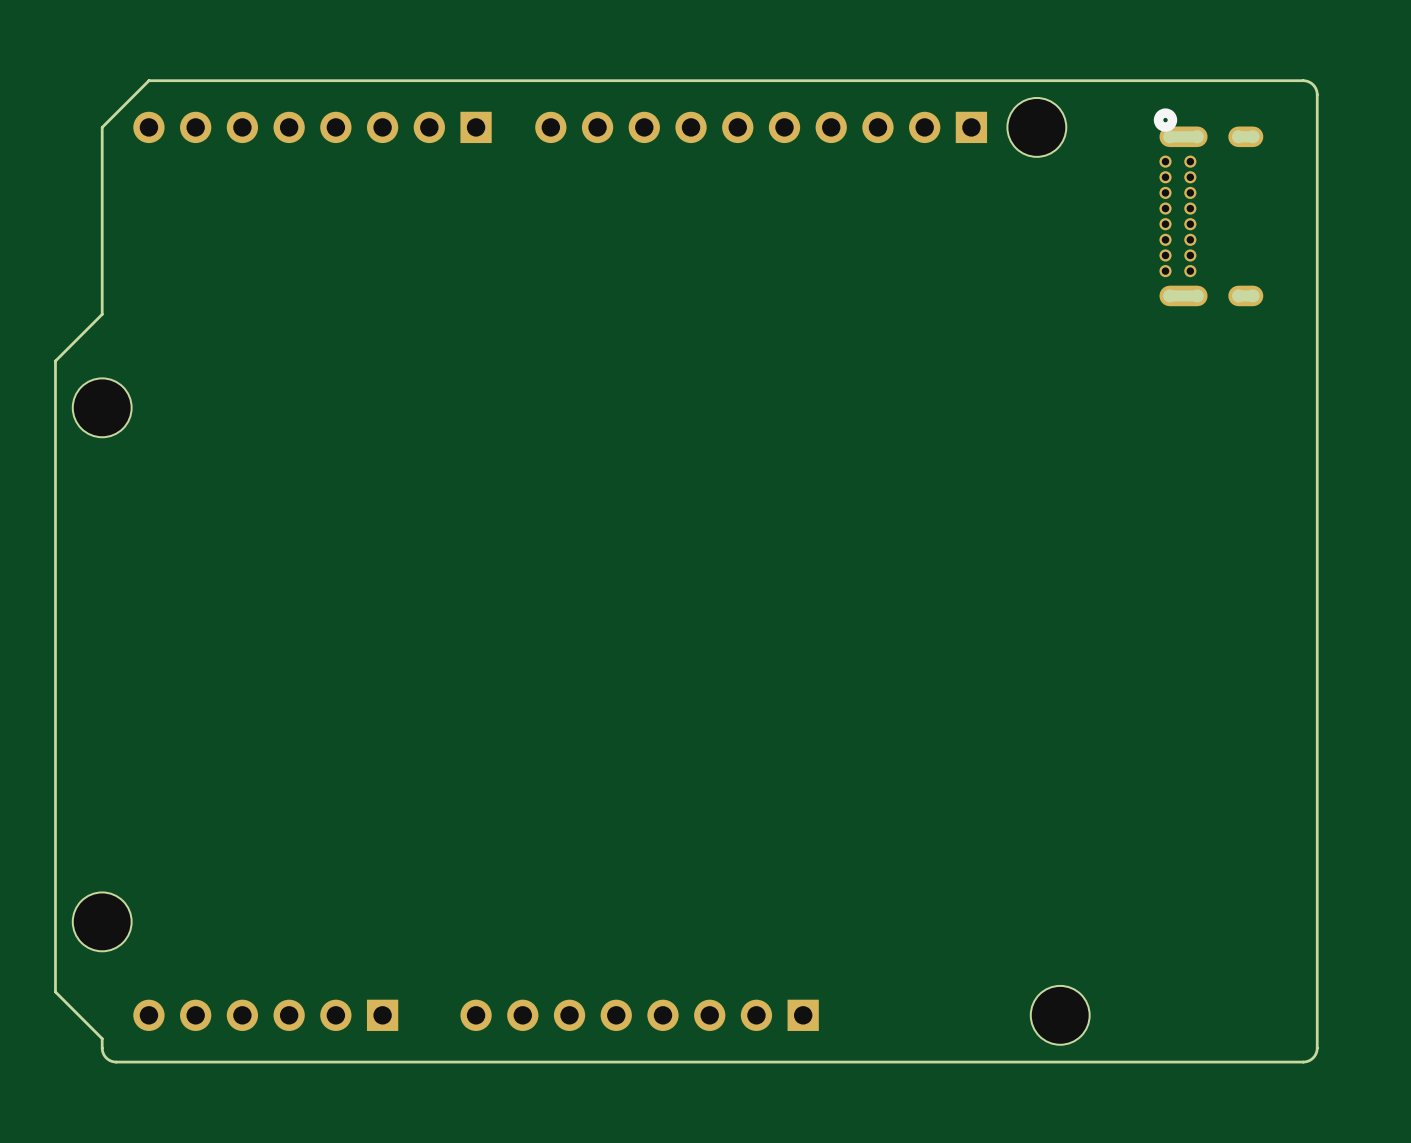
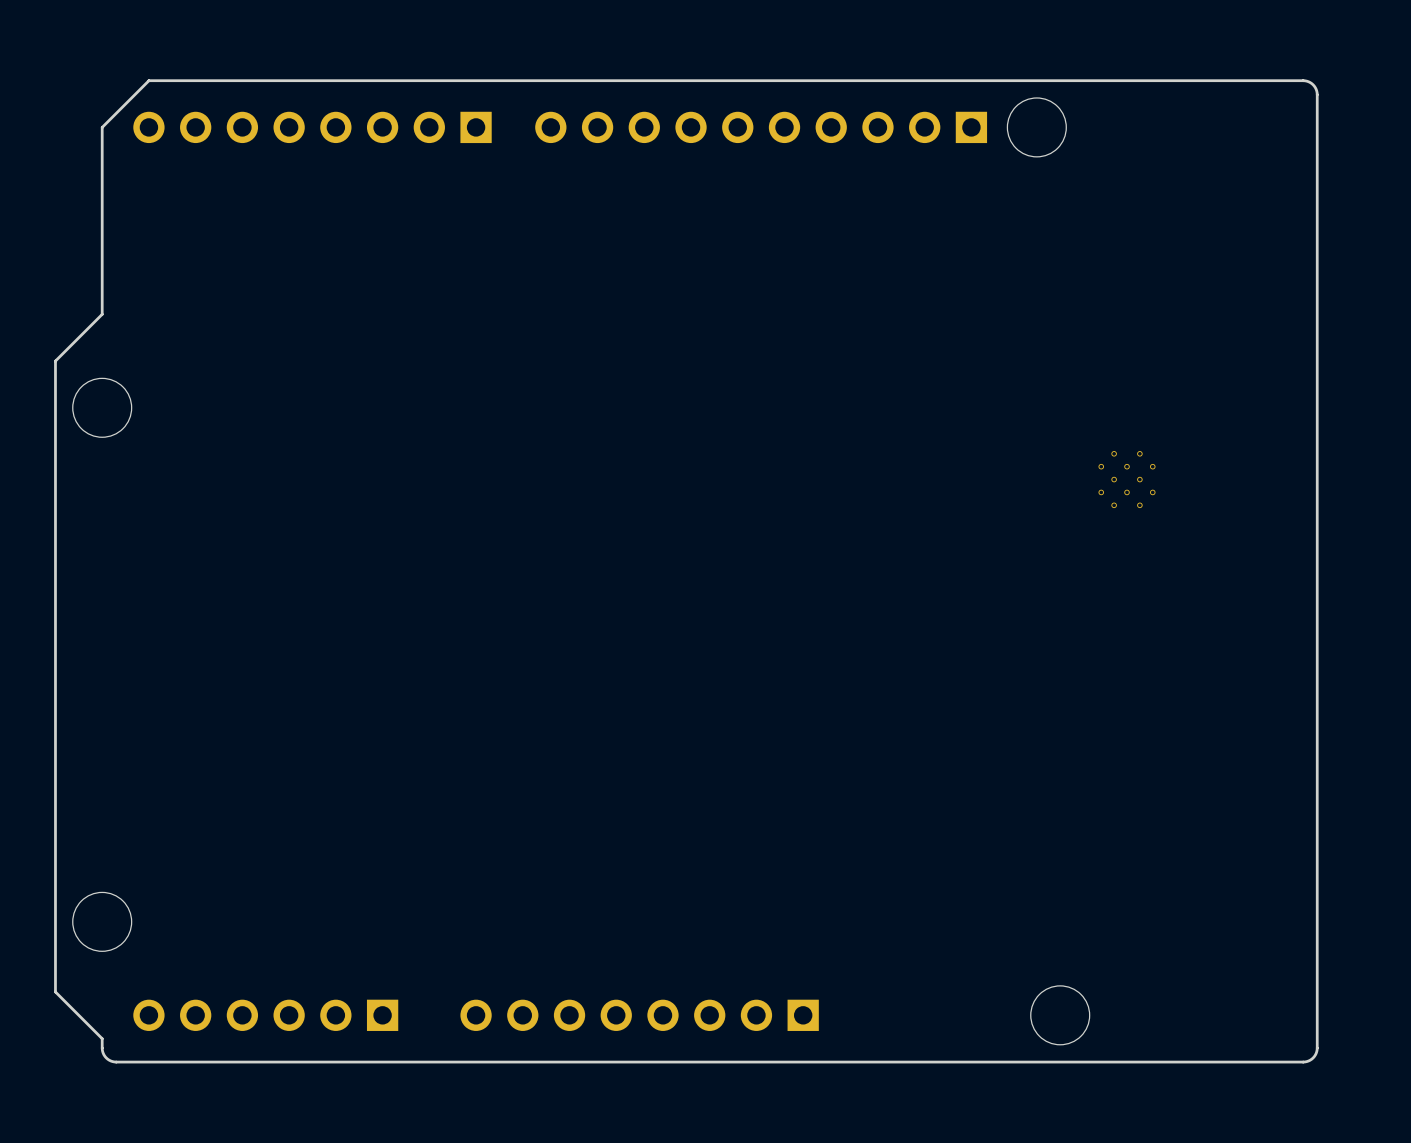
part: (1208, 207) -> none
part: none -> (1127, 479)

